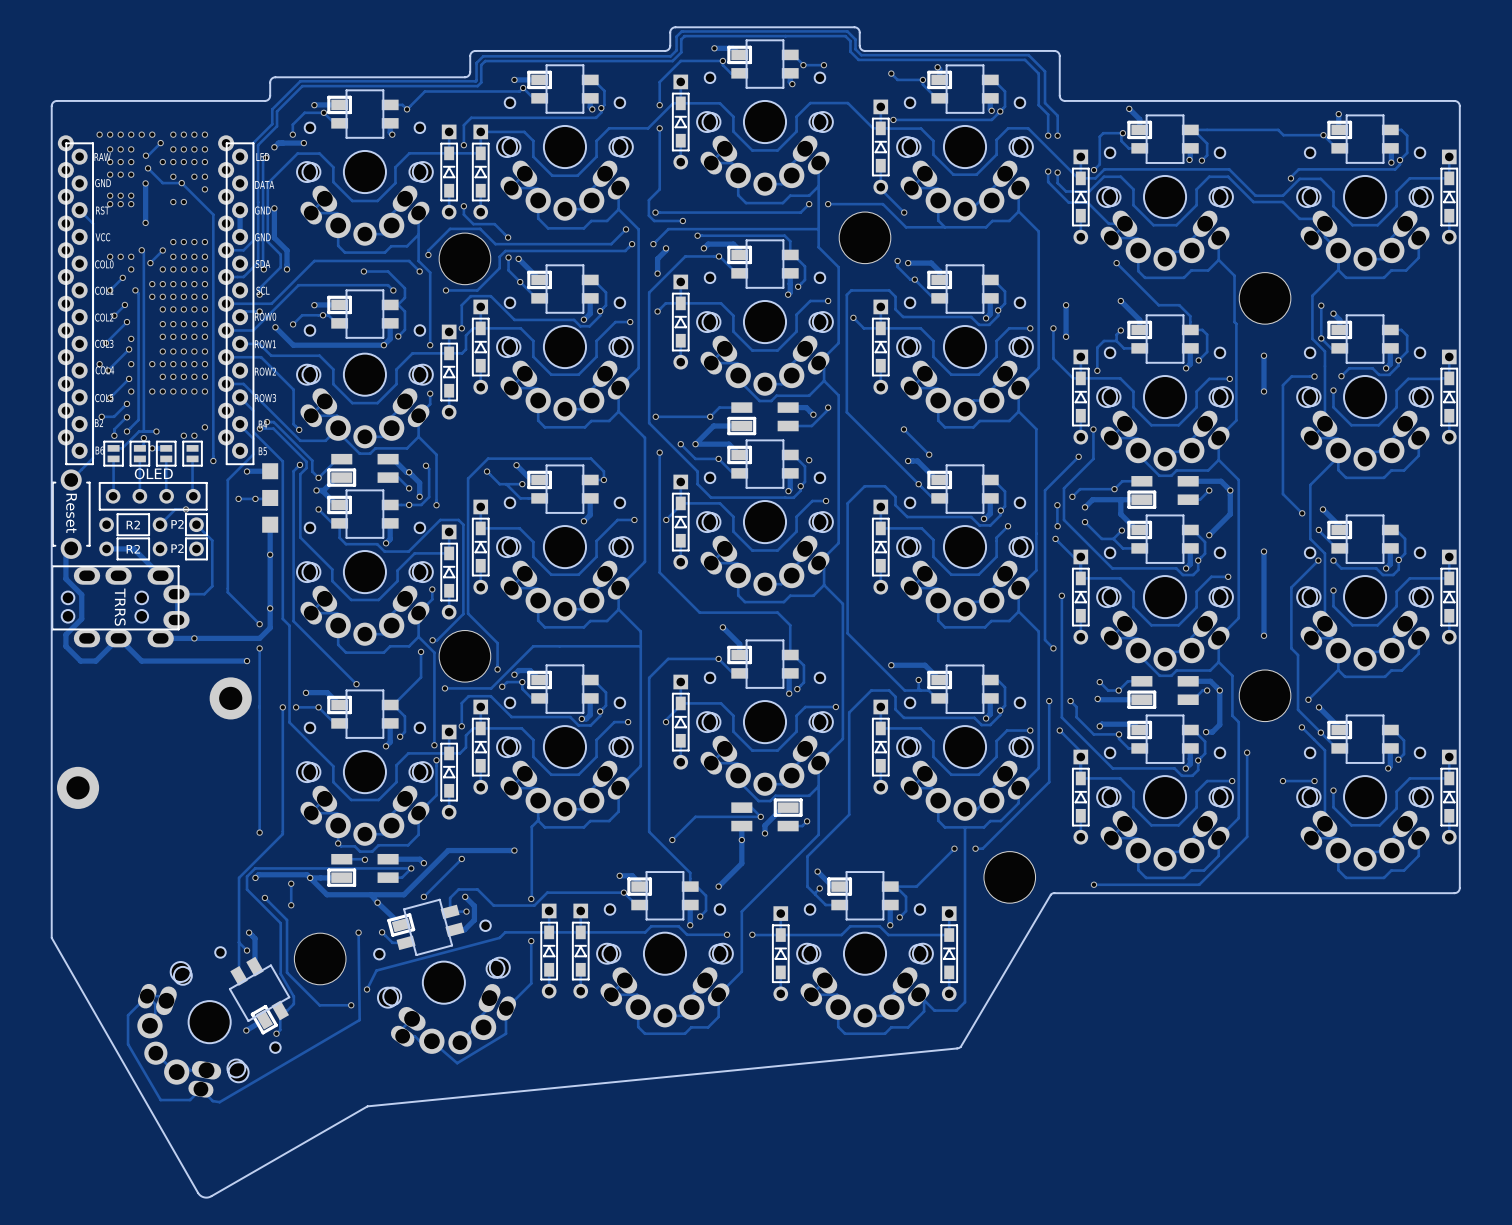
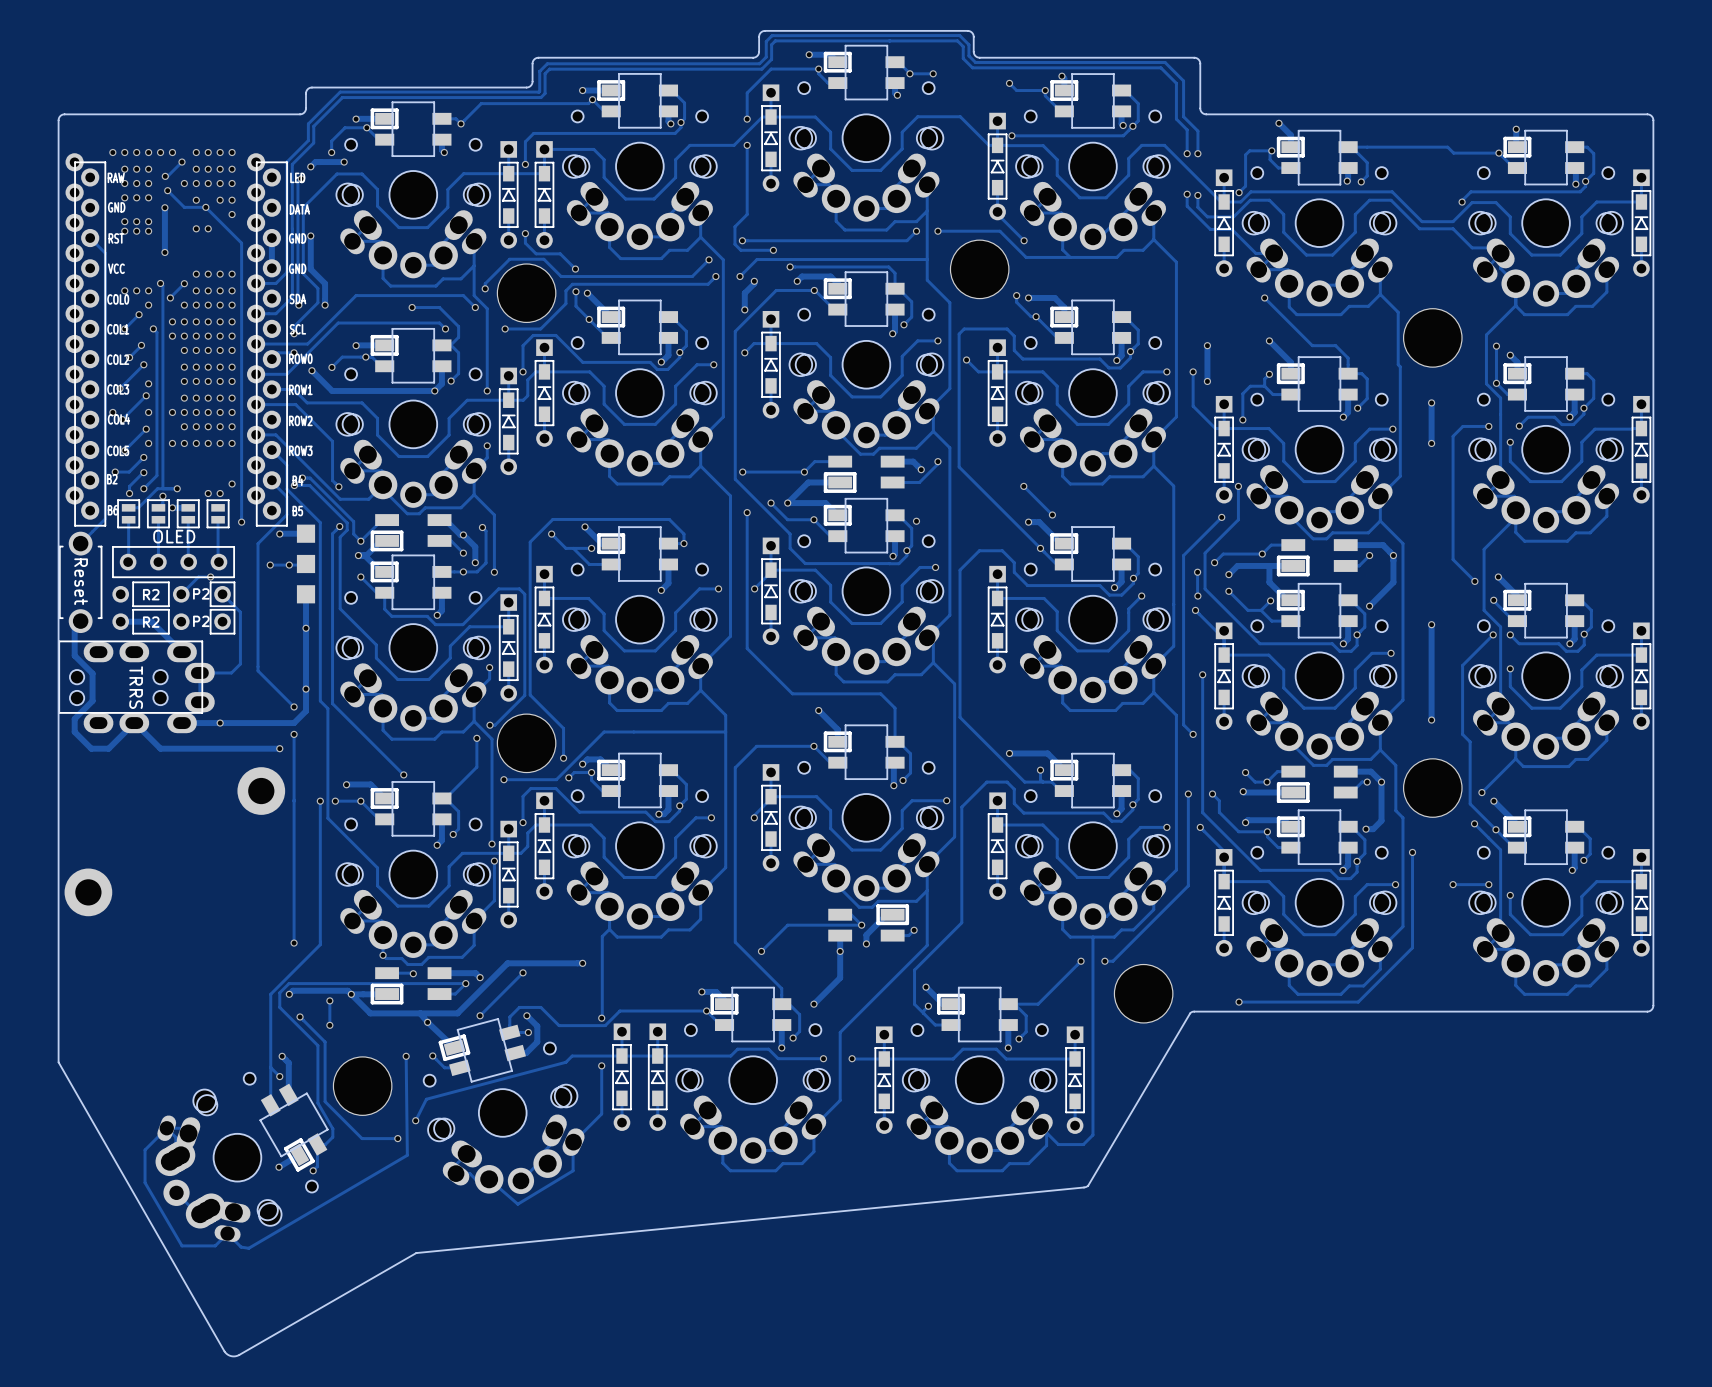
part footprint: [137, 947, 281, 1098] -> [155, 1072, 318, 1243]

